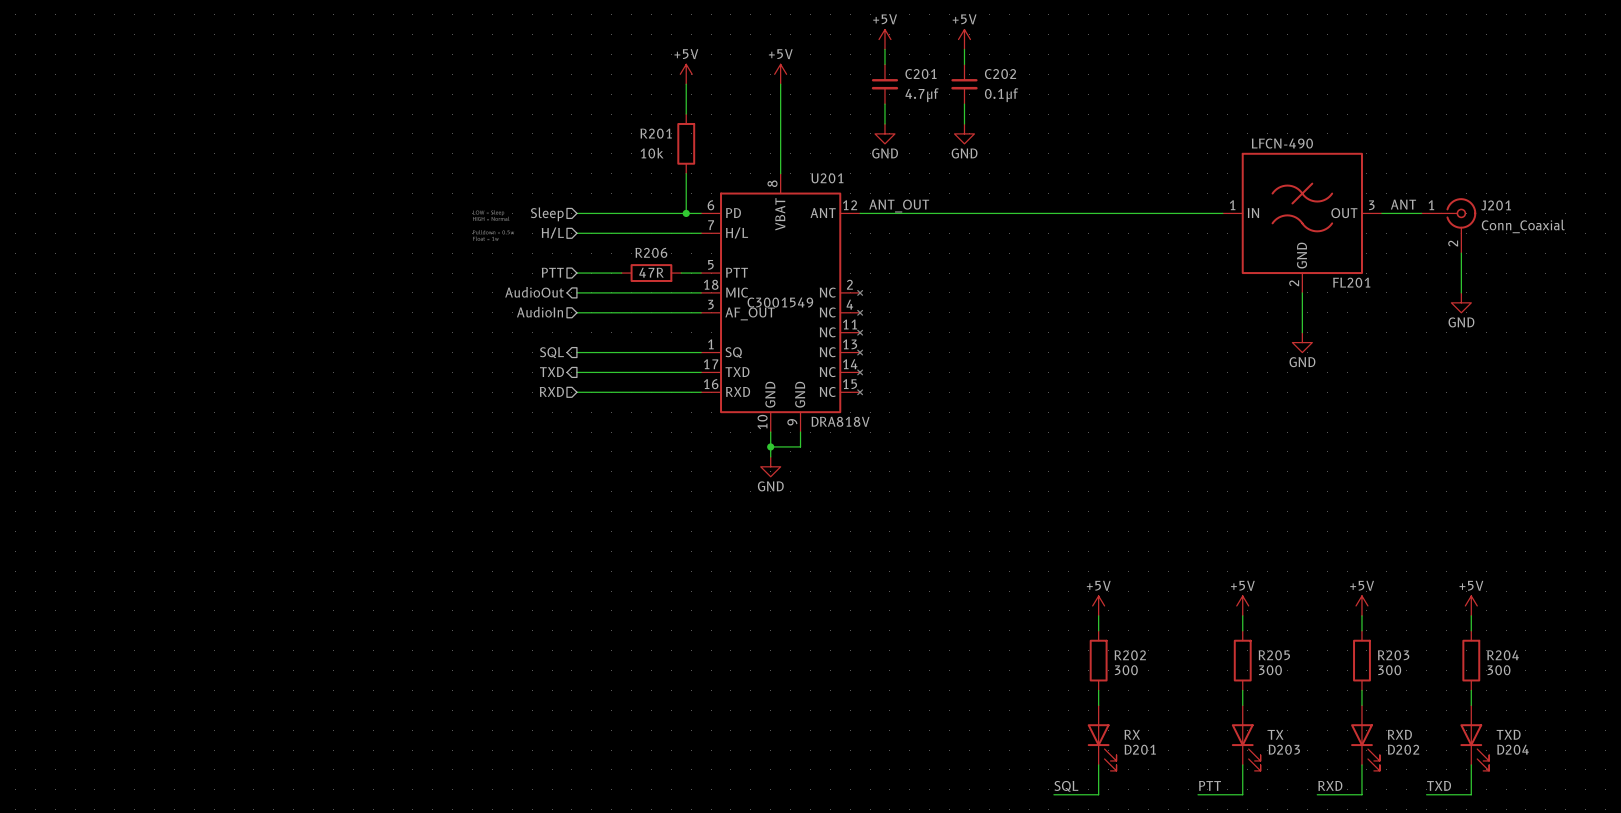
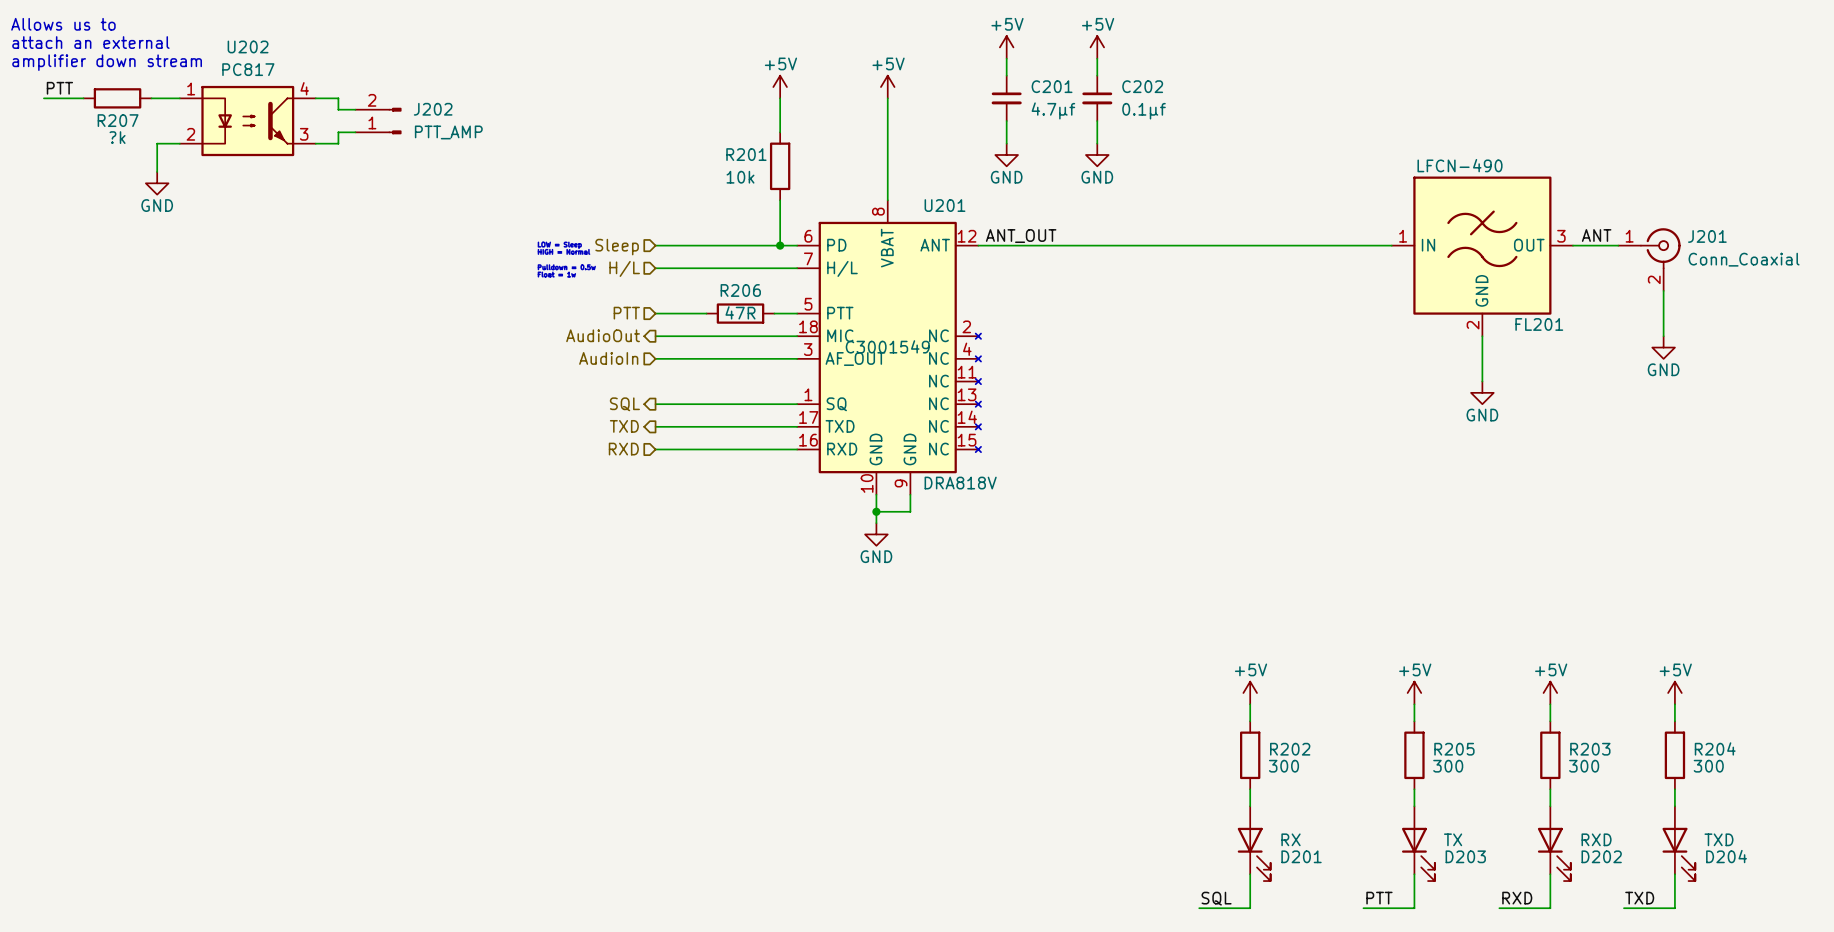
text: none -> Allows us to (63, 24)
text: none -> attach an external (90, 42)
text: none -> amplifier down stream (107, 62)
label: none -> PTT (59, 88)
wire: none -> (43, 98) (83, 98)
R207: none -> ?k (117, 98)
wire: none -> (151, 98) (179, 98)
wire: none -> (315, 98) (338, 98) (338, 109) (355, 109)
U202: none -> PC817 (247, 121)
J202: none -> PTT_AMP (378, 121)
wire: none -> (355, 132) (338, 132) (338, 143) (315, 143)
wire: none -> (179, 143) (157, 143) (157, 171)
power symbol: none -> GND (157, 183)

